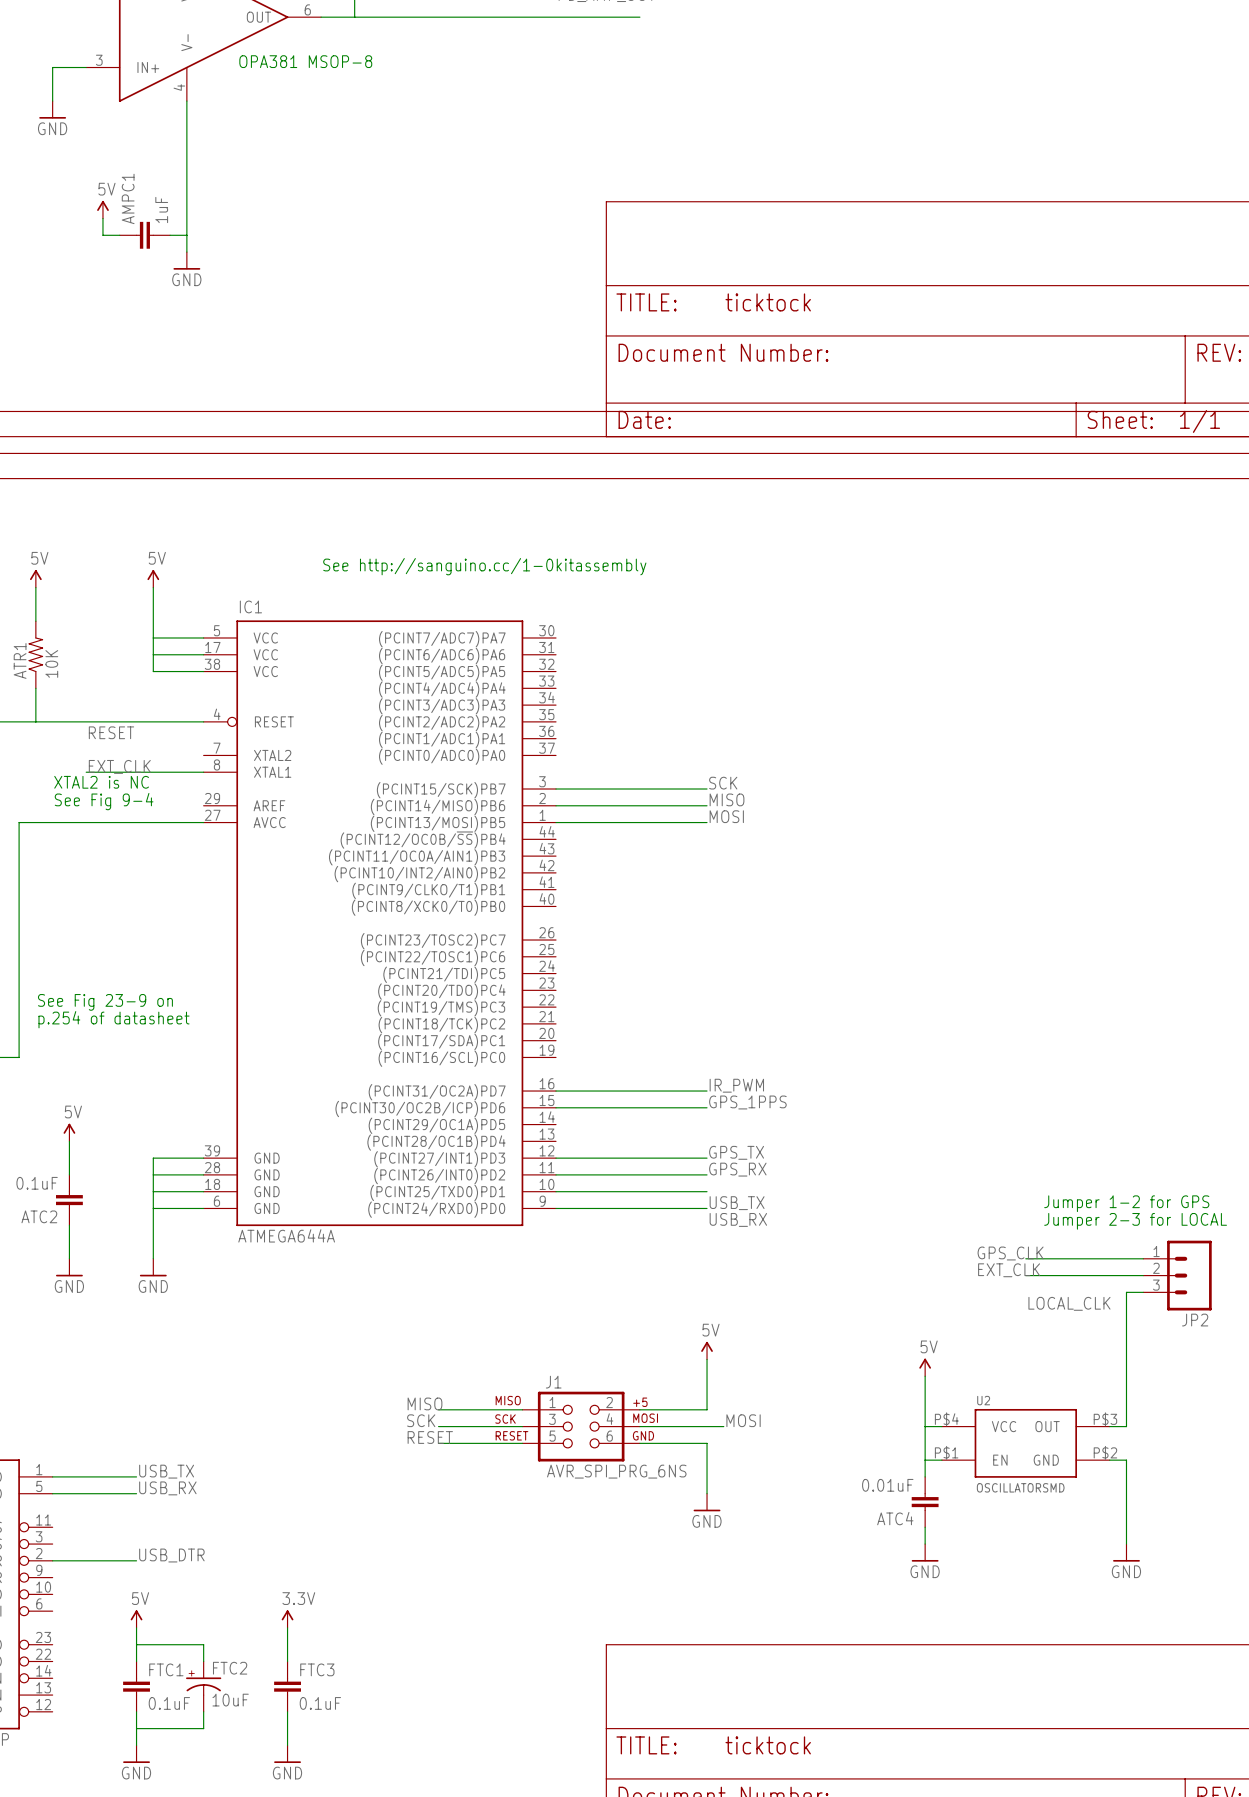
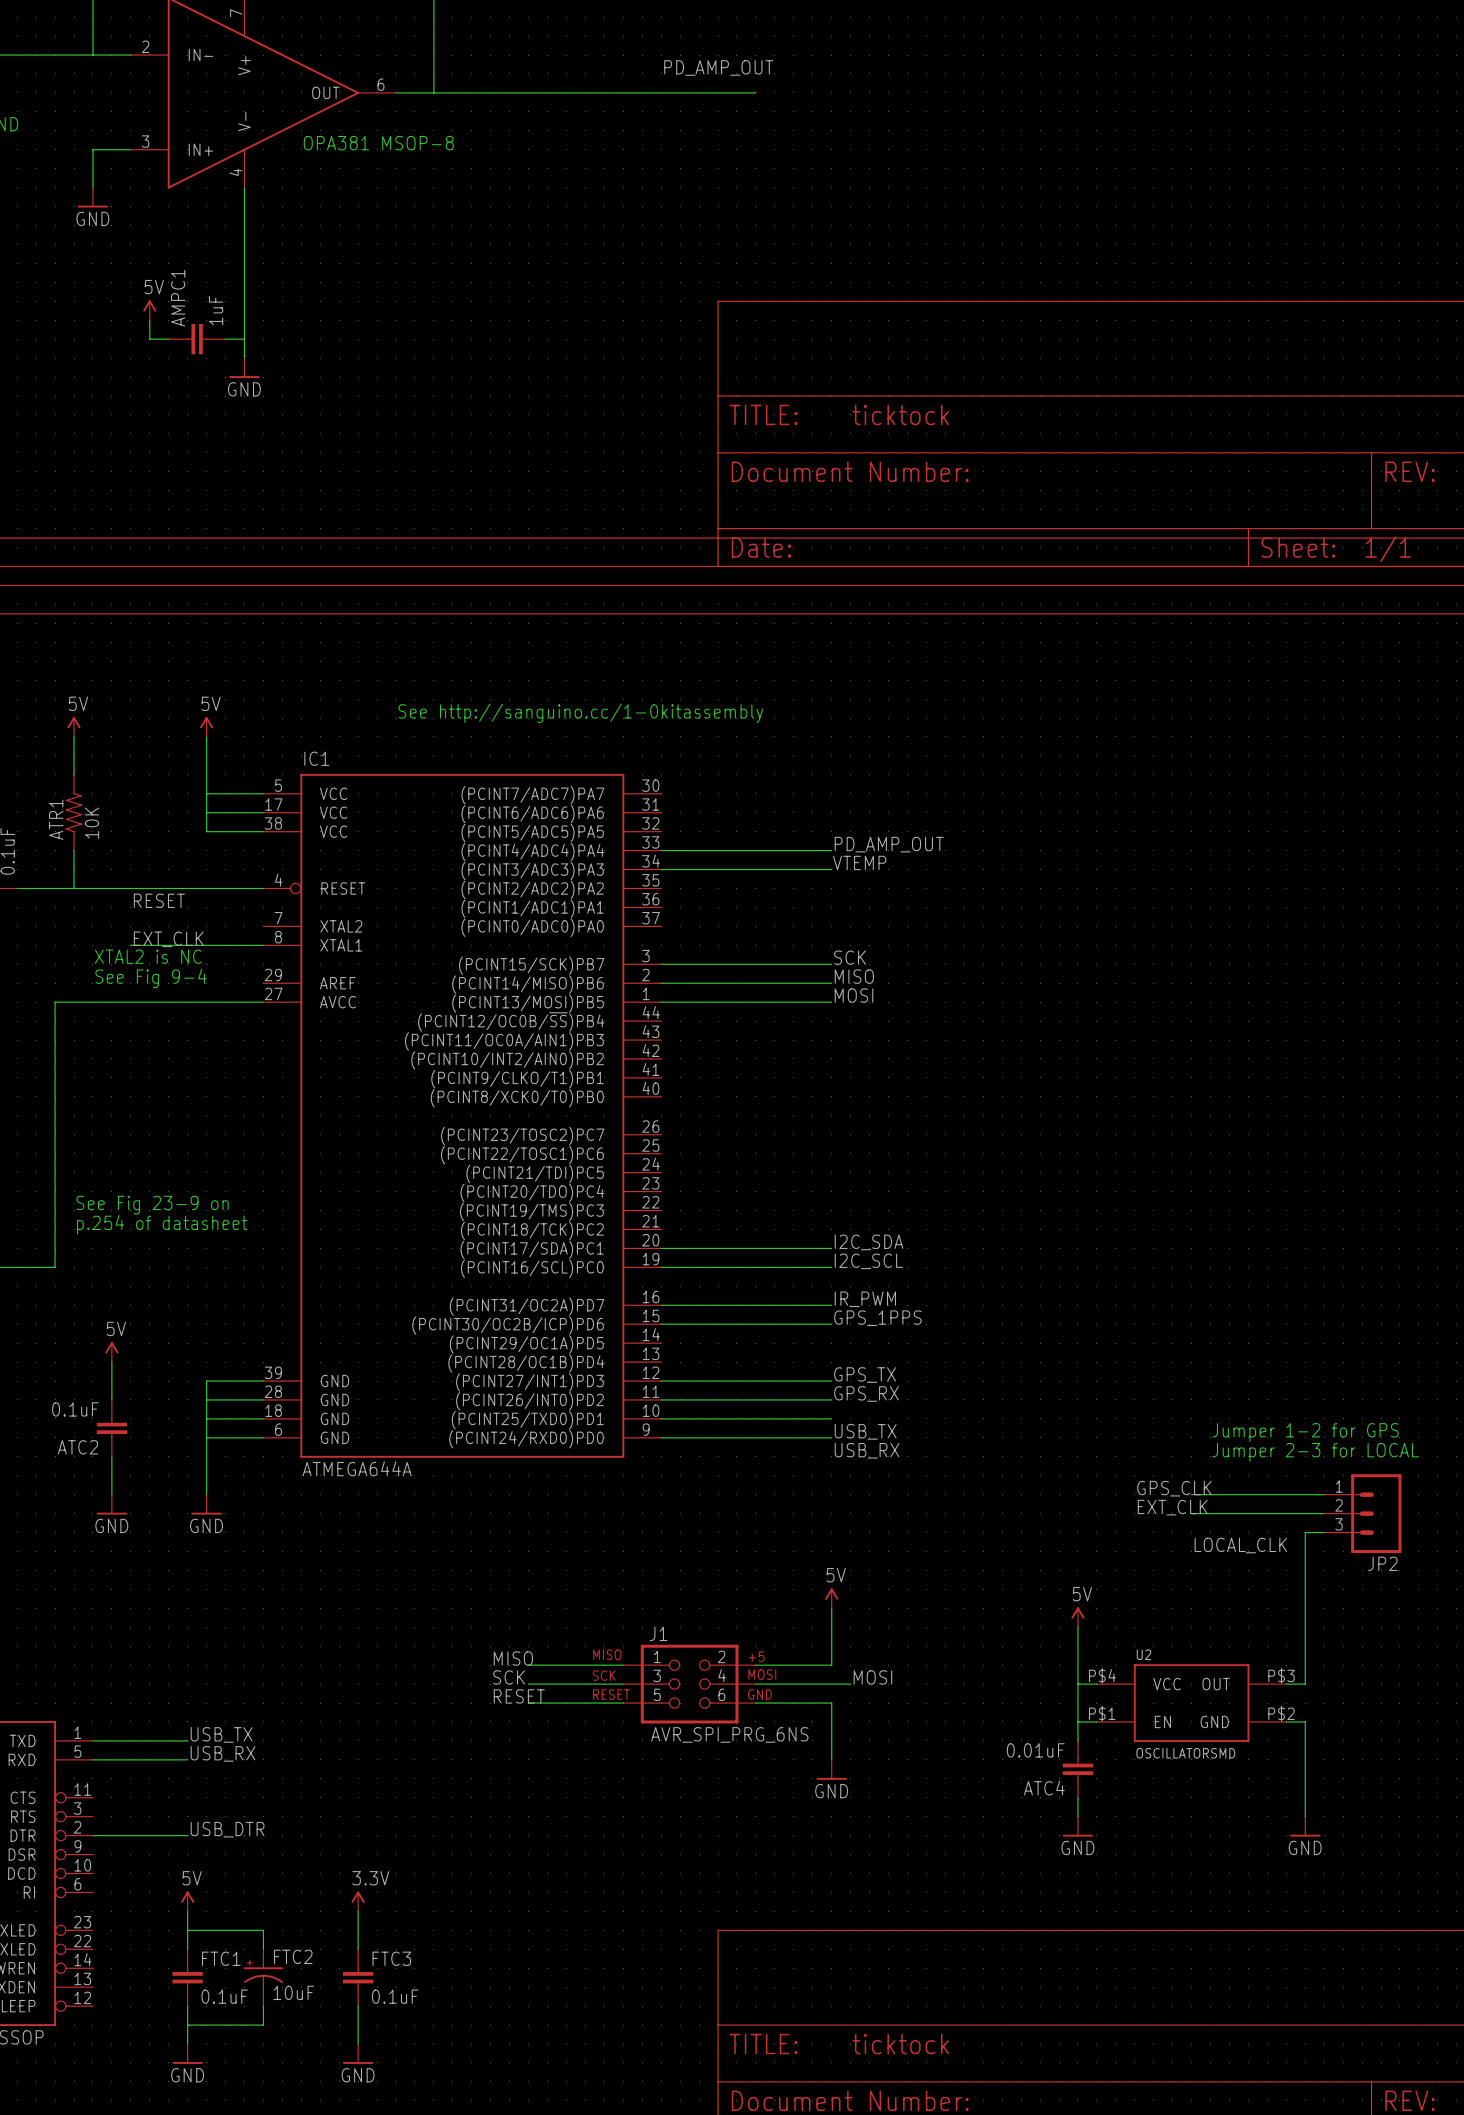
label: none -> PD_AMP_OUT (889, 844)
wire: none -> (661, 850) (831, 850)
label: none -> VTEMP (859, 862)
wire: none -> (661, 869) (831, 869)
label: none -> I2C_SDA (869, 1242)
wire: none -> (661, 1248) (831, 1248)
label: none -> I2C_SCL (868, 1261)
wire: none -> (661, 1267) (831, 1267)

